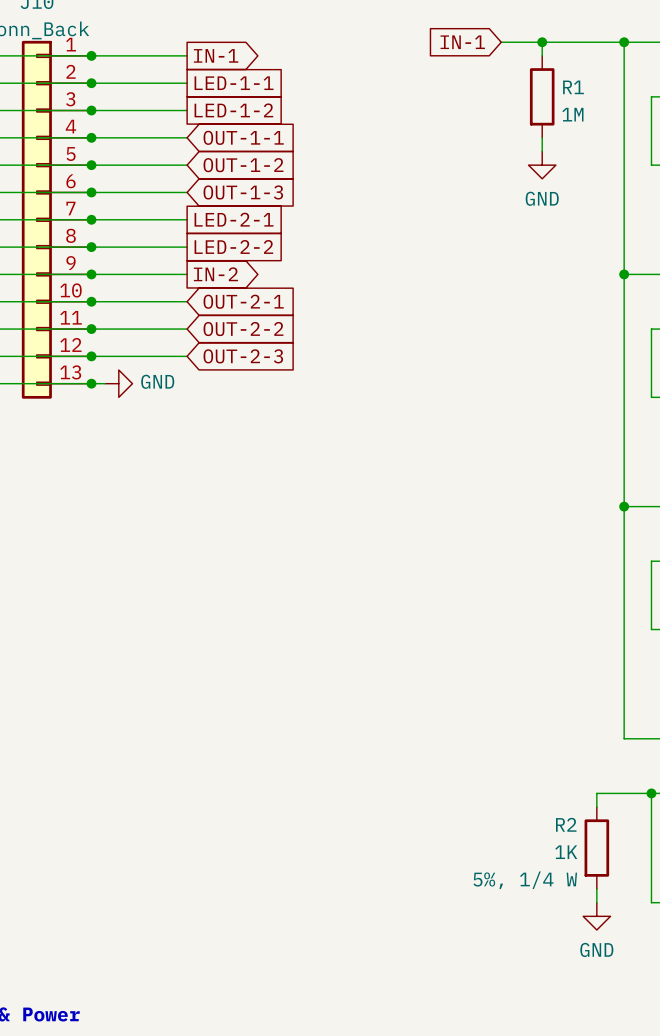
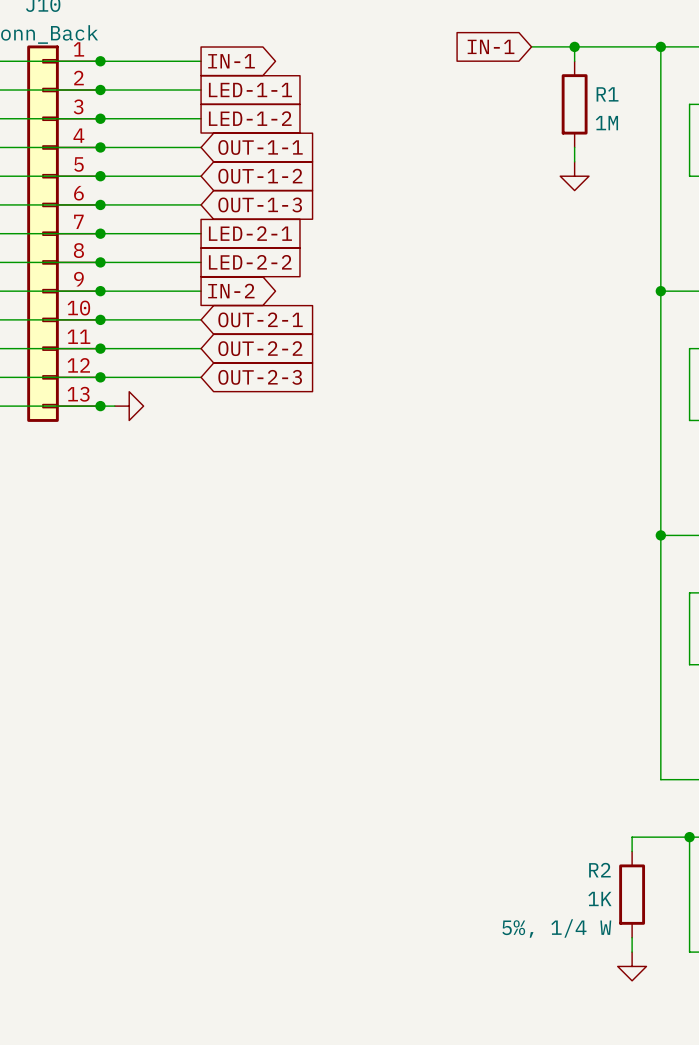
power symbol text: GND (542, 198) -> none
power symbol text: GND (157, 381) -> none
power symbol text: GND (596, 949) -> none

